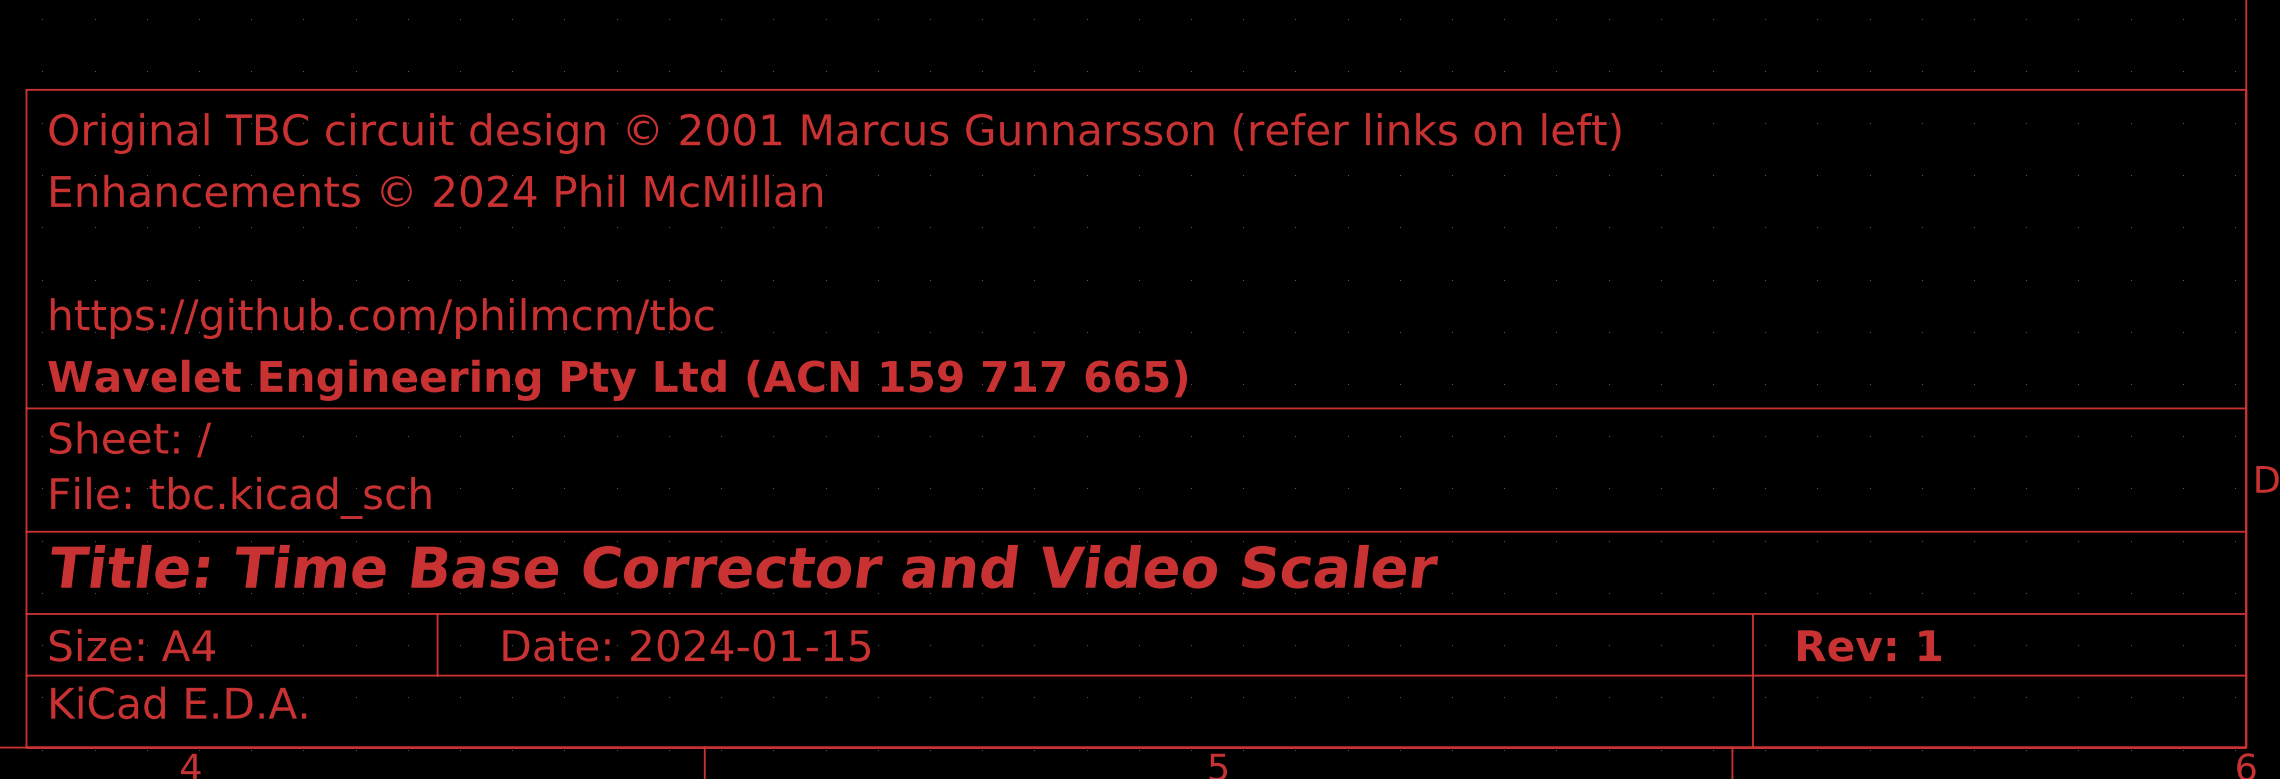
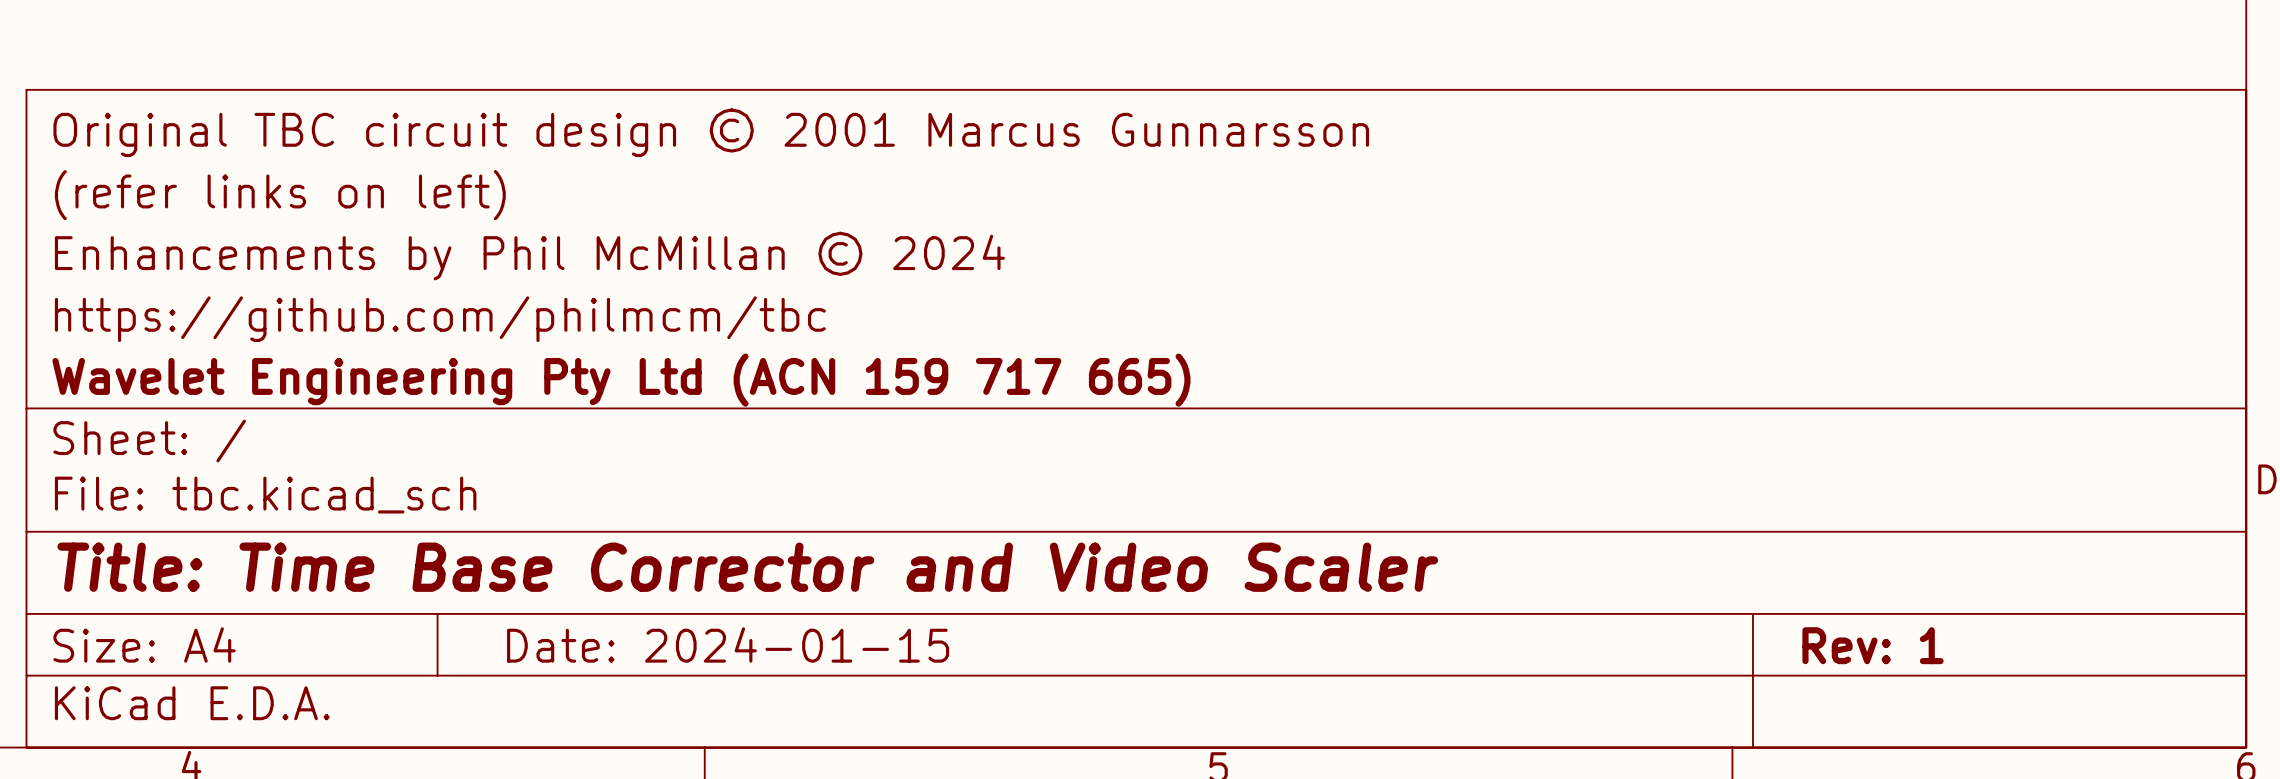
title block: Original TBC circuit design © 2001 Marcus Gunnarsson (refer links on left) (834, 133) -> Original TBC circuit design © 2001 Marcus Gunnarsson (711, 132)
title block: Enhancements © 2024 Phil McMillan (436, 191) -> (refer links on left) (280, 195)
title block: none -> Enhancements by Phil McMillan © 2024 (529, 256)

